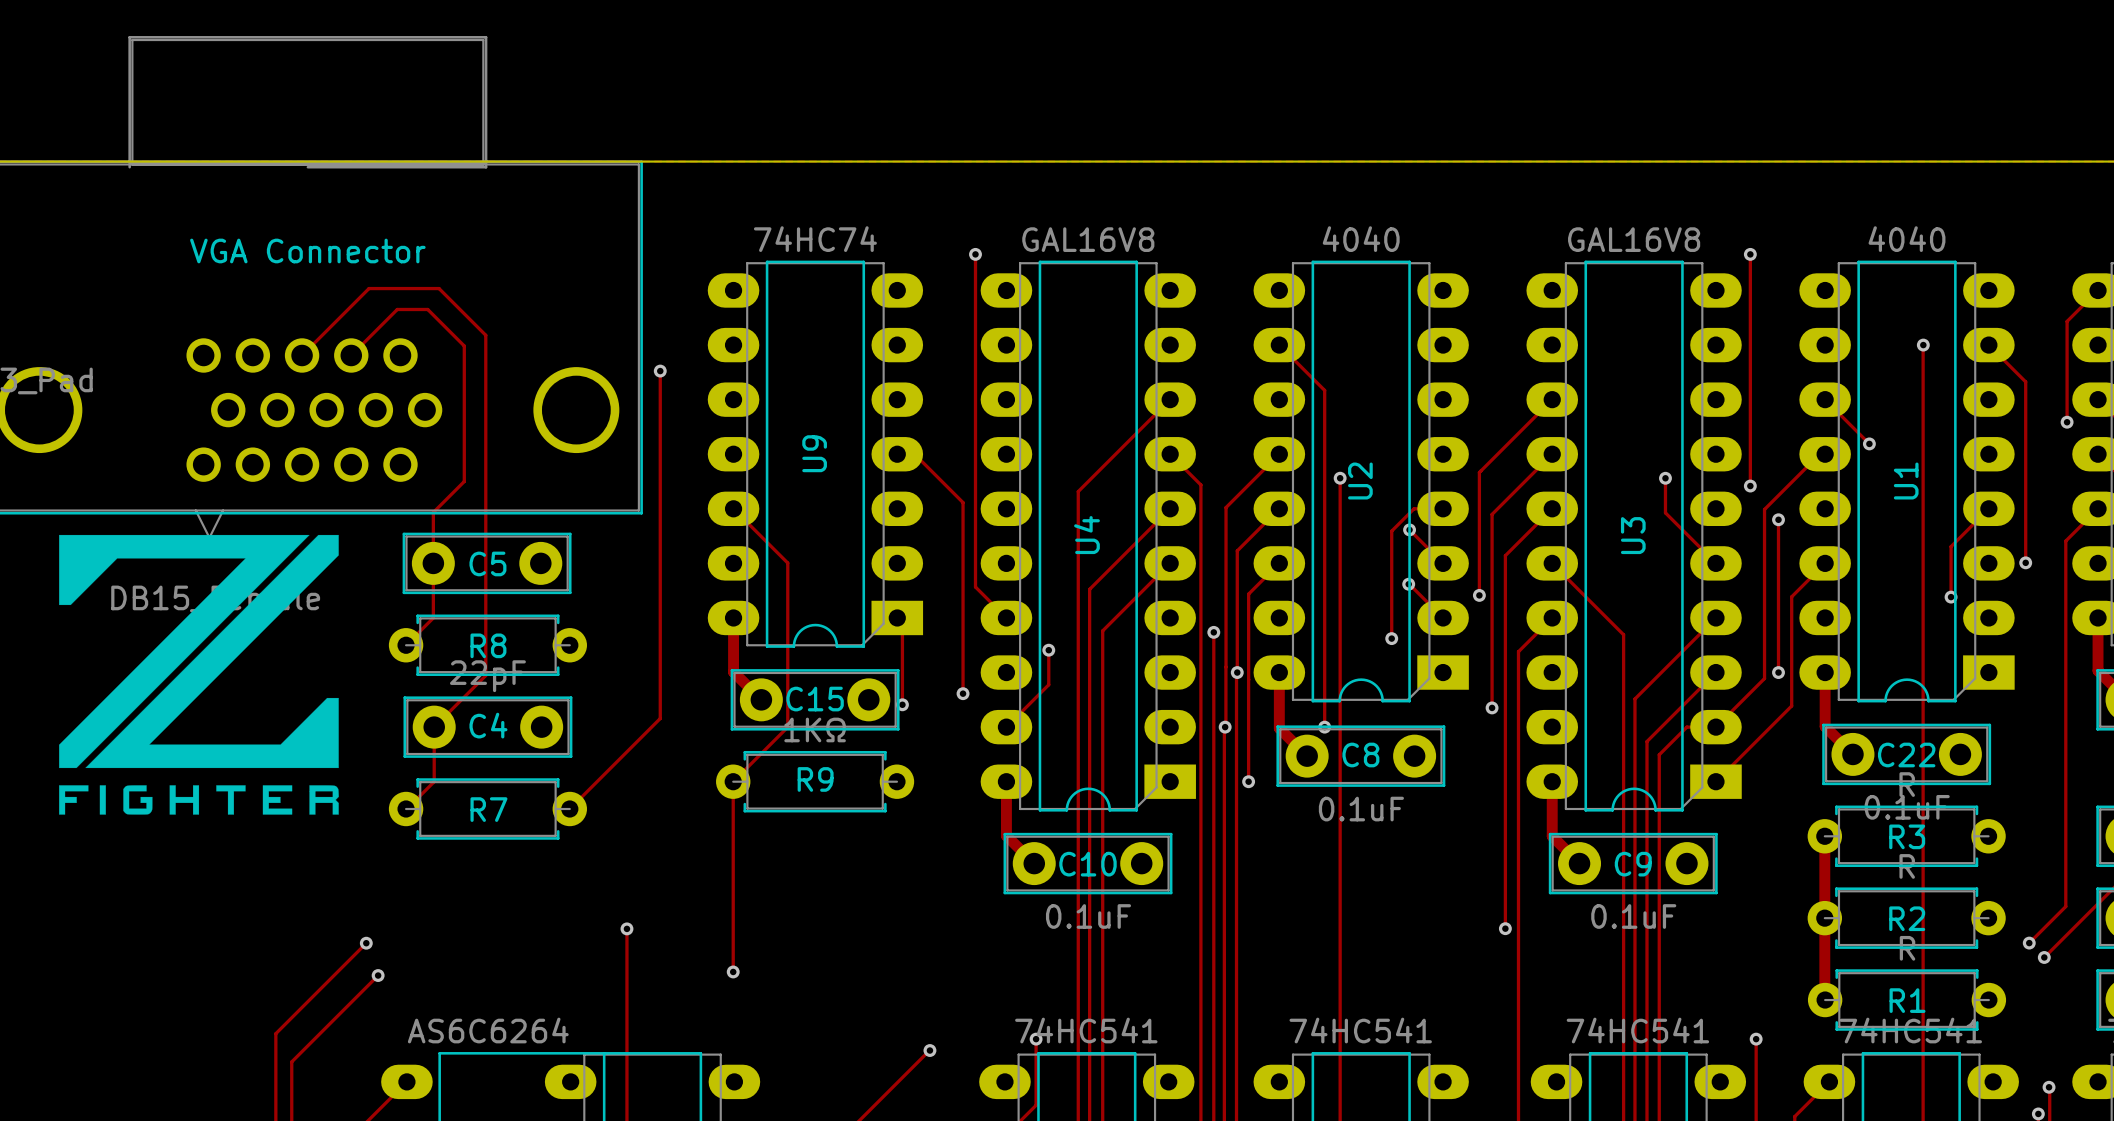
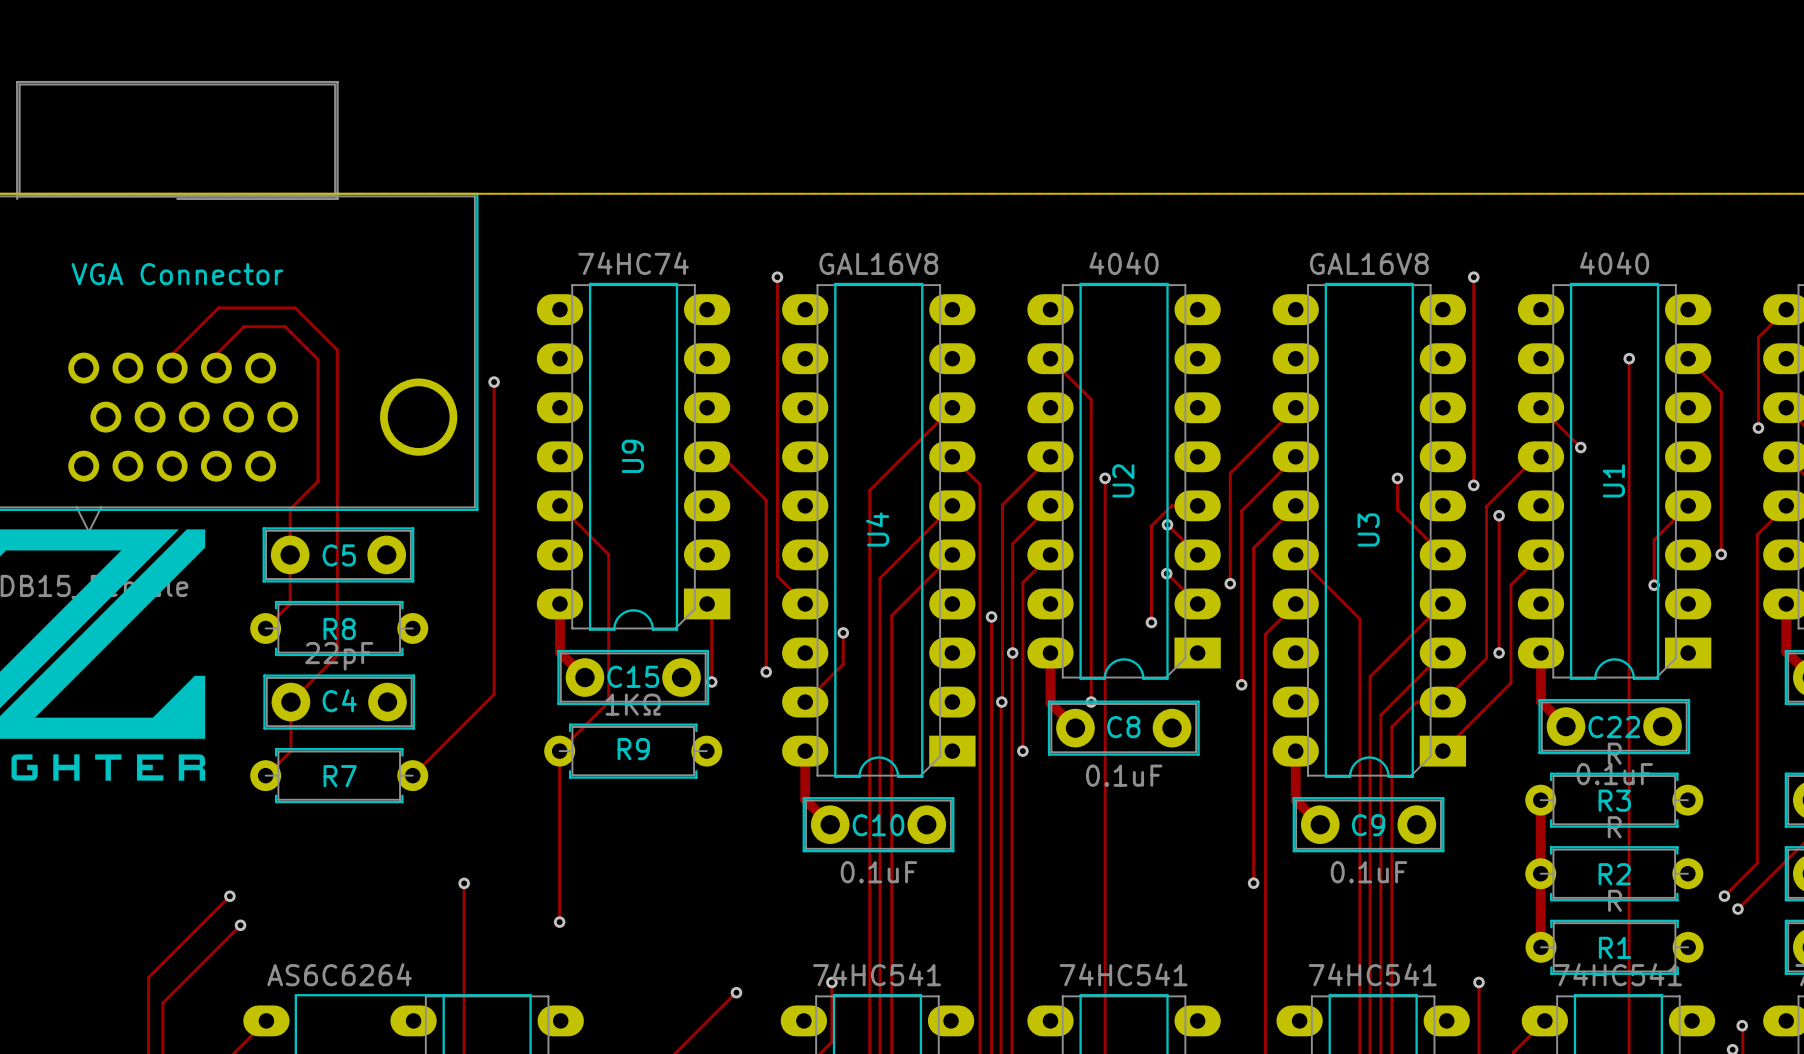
track: (369, 288) (302, 355) -> (232, 307) (218, 307) (171, 354)
track: (397, 309) (351, 355) -> (257, 326) (244, 326) (216, 354)

